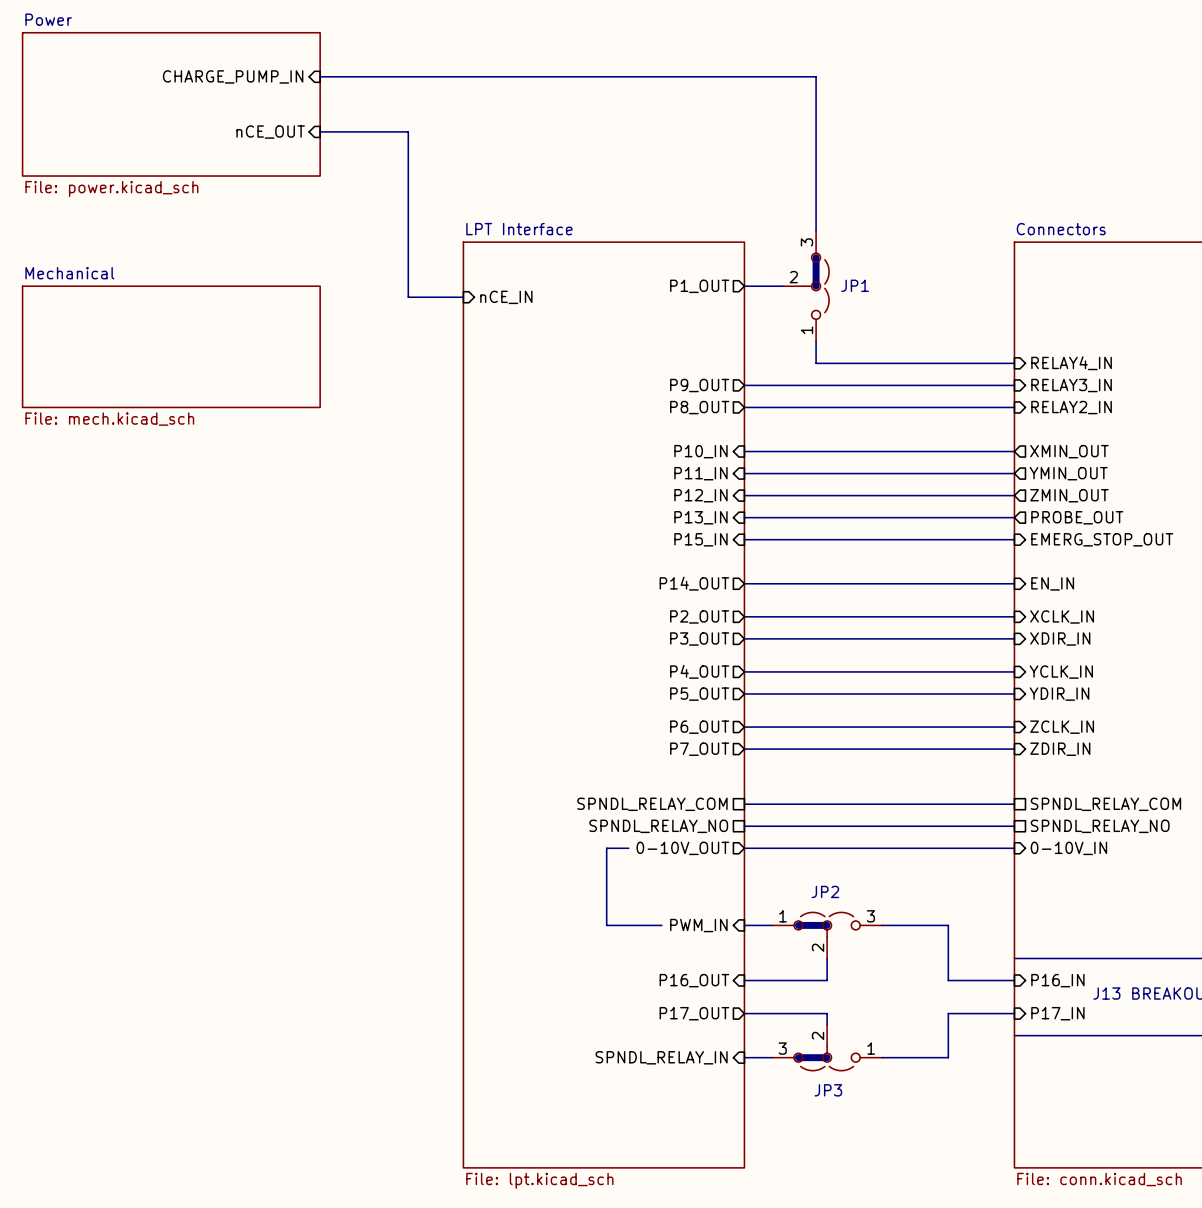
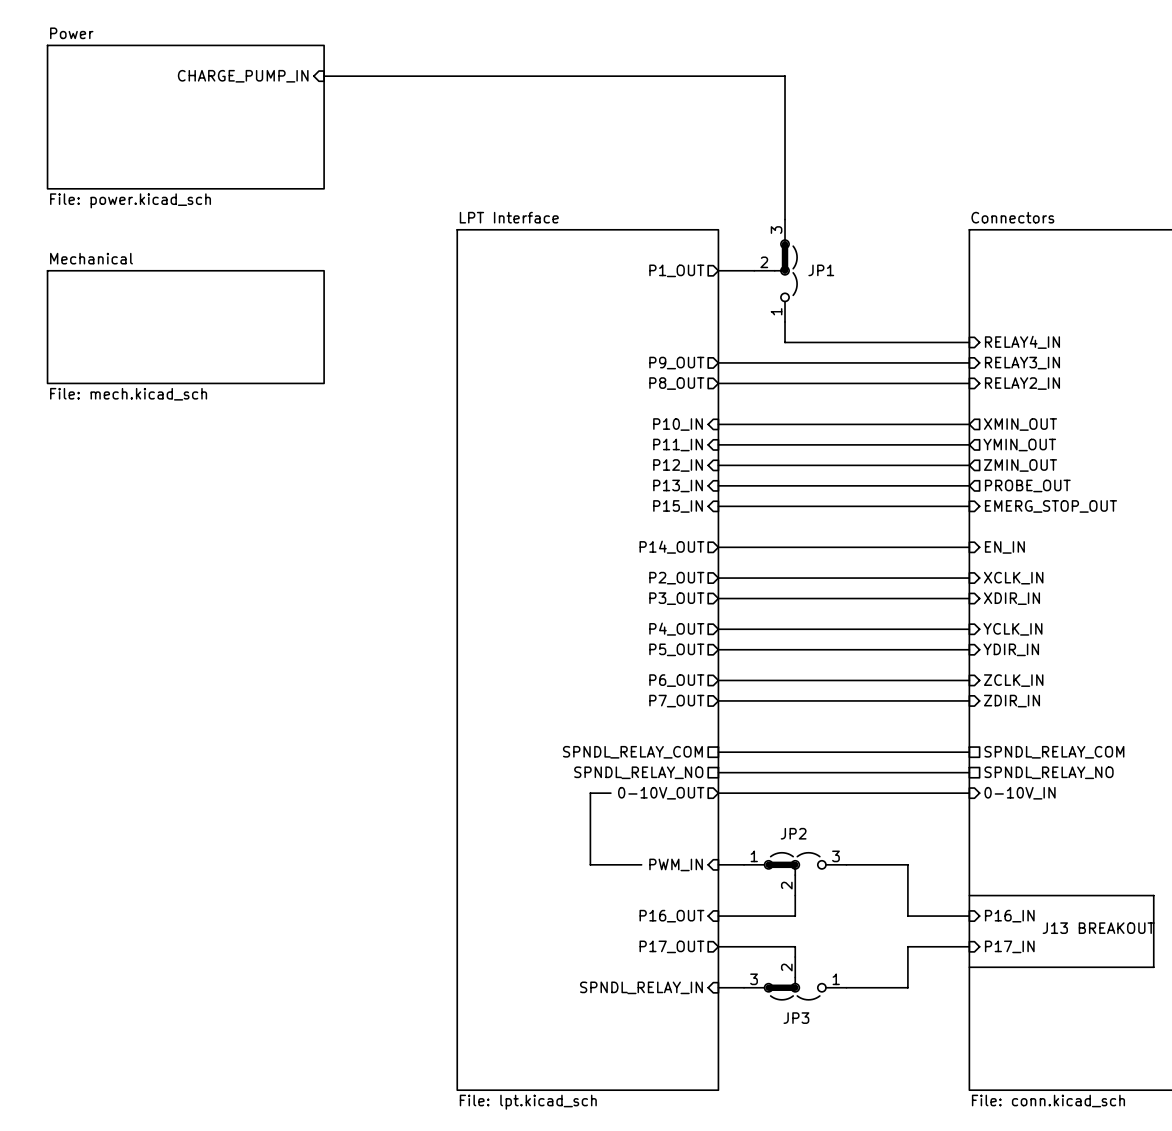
sheet Power: File: power.kicad_sch (171, 104) -> none
sheet Power: none -> File: power.kicad_sch (185, 117)
wire: (320, 131) (408, 131) (408, 297) (463, 297) -> none
sheet pin: nCE_OUT (270, 132) -> none
sheet pin: nCE_IN (506, 297) -> none

